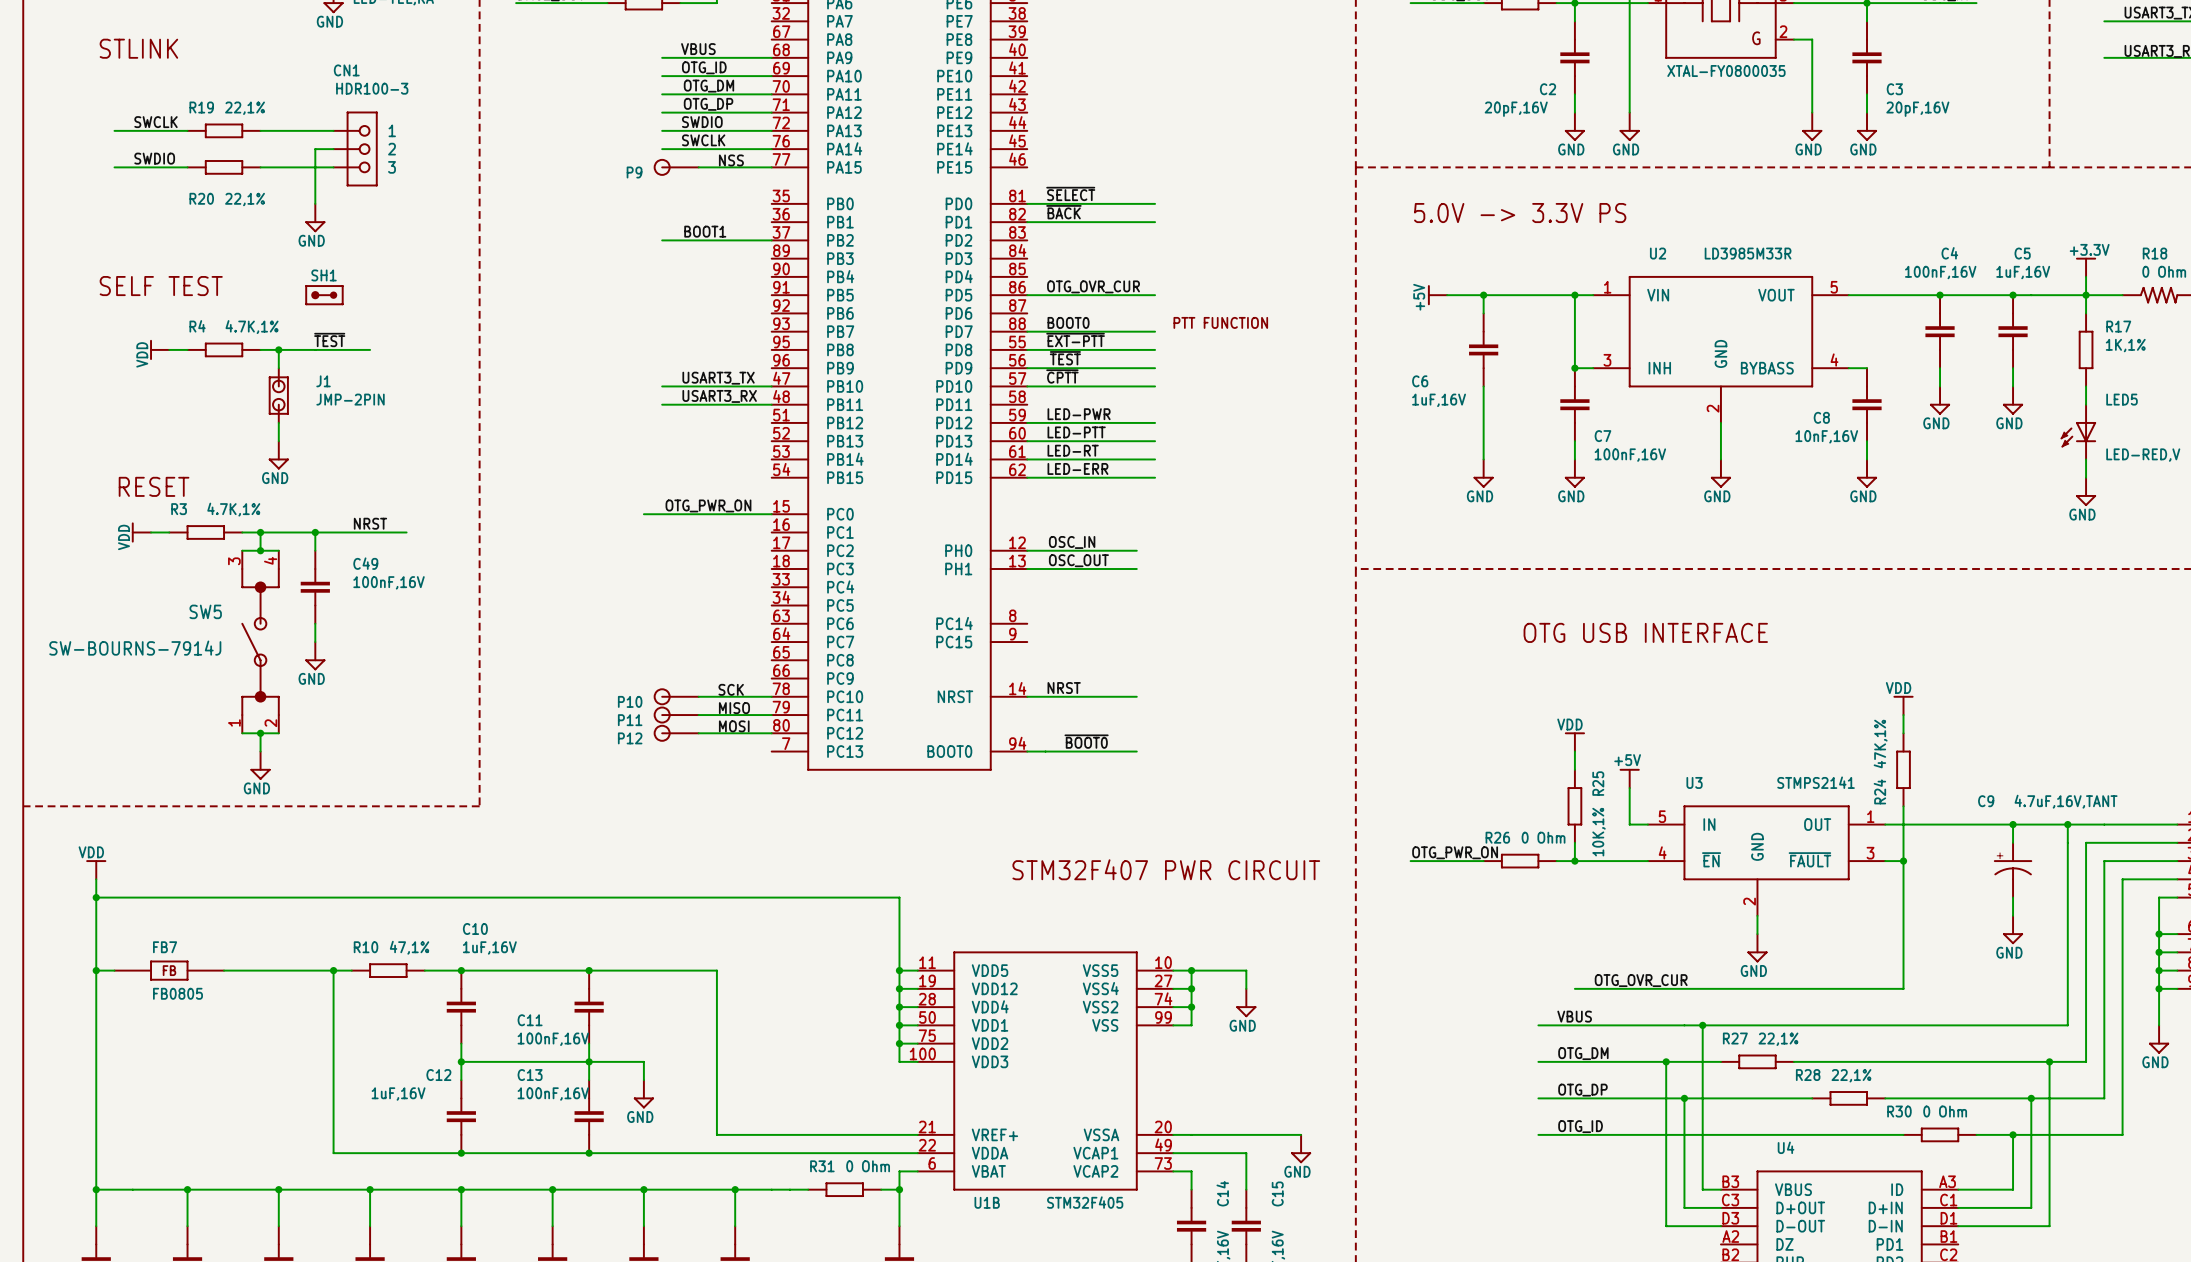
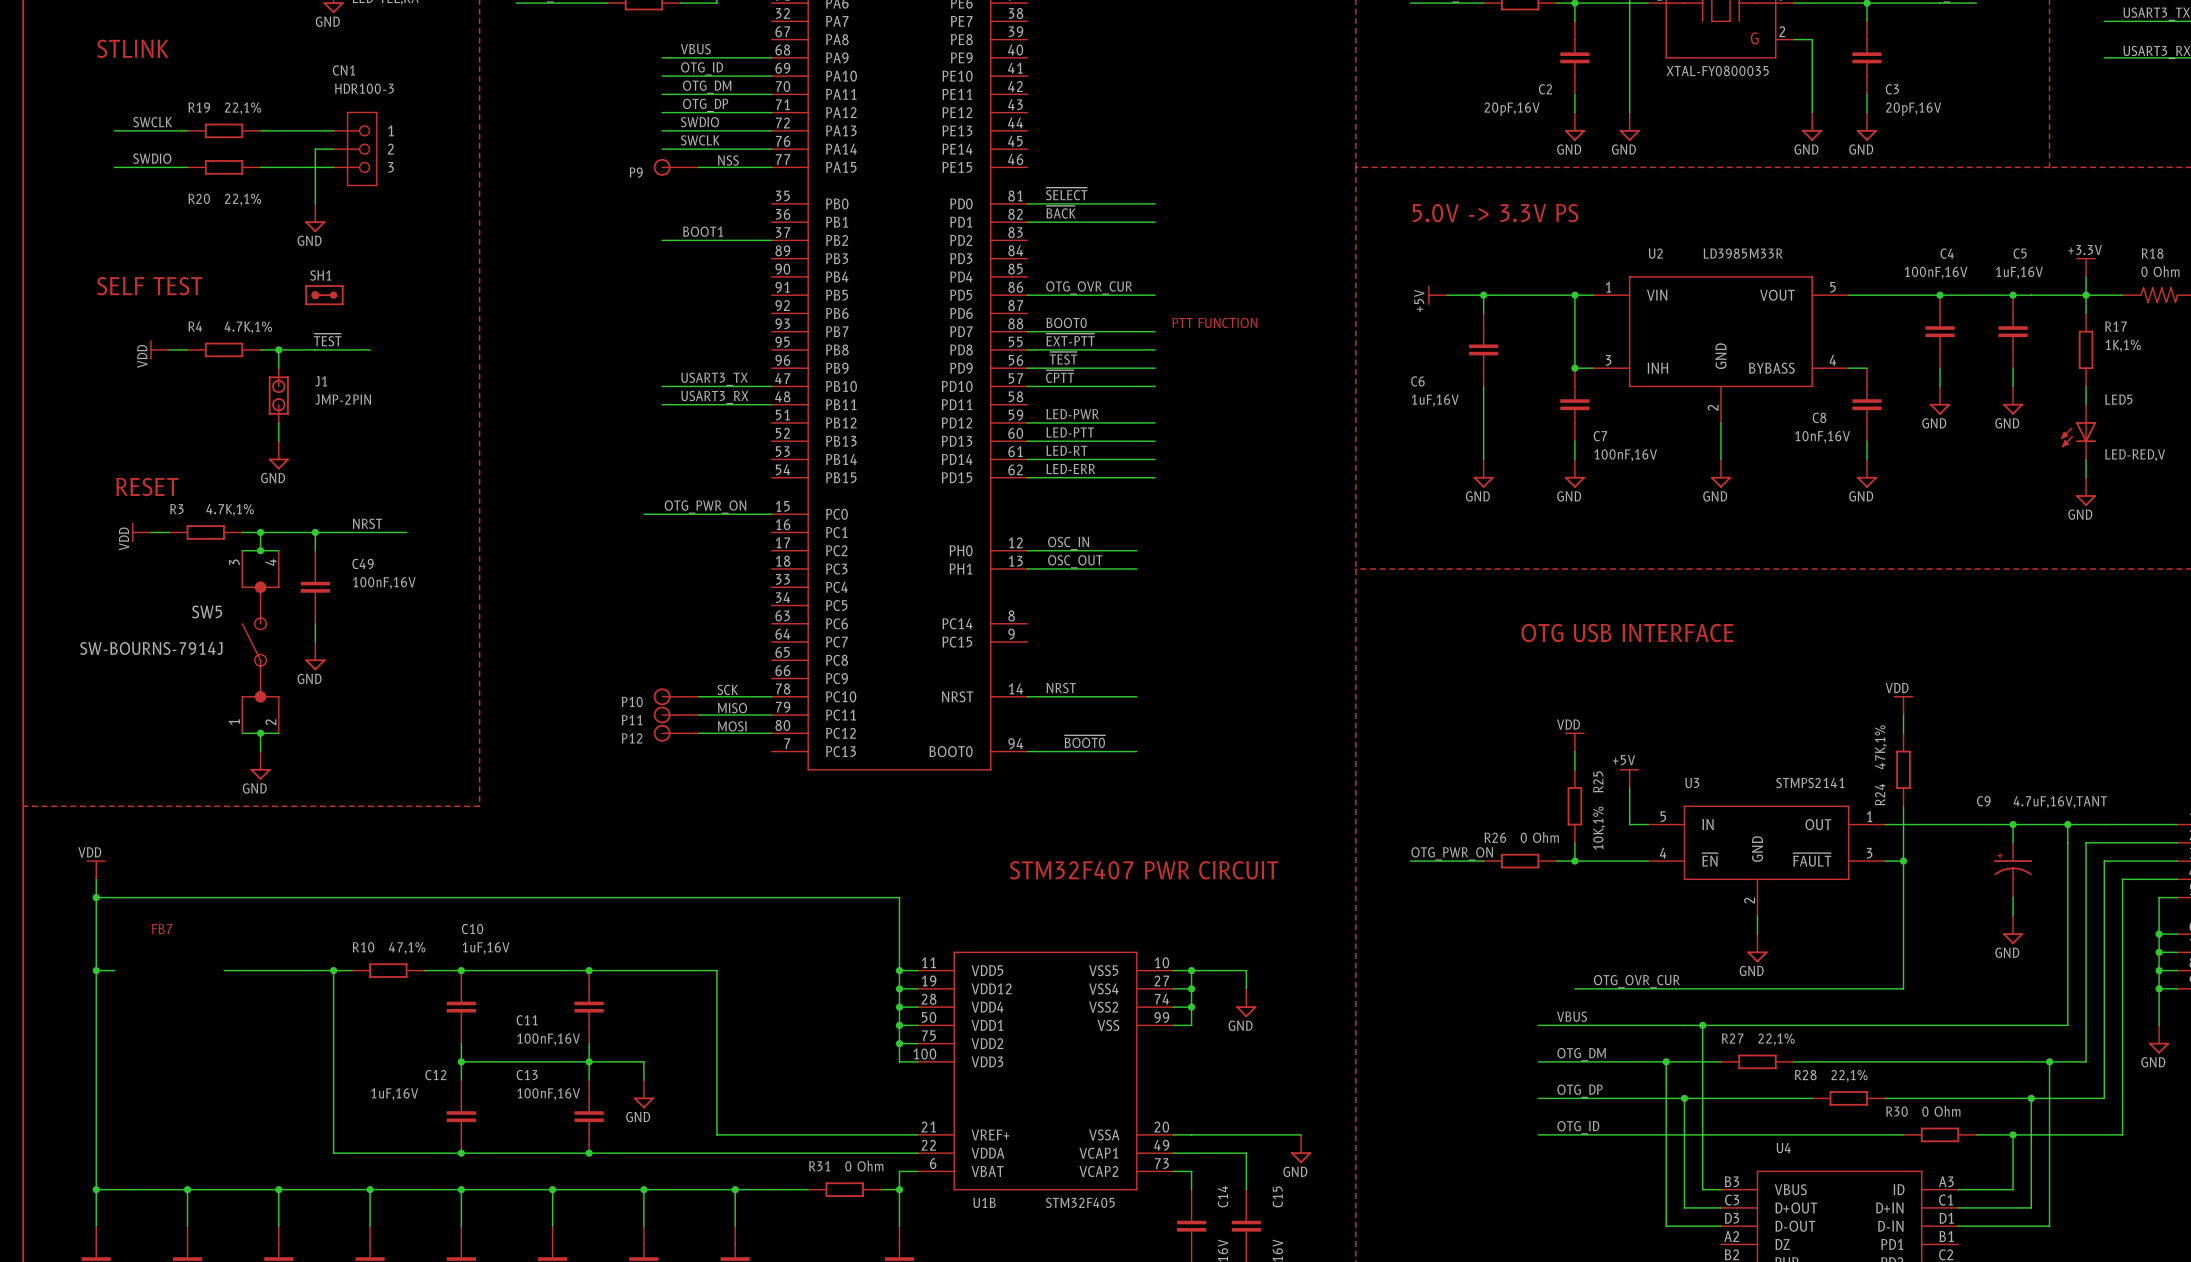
text: none -> FB7 (162, 929)
FB7: FB0805 (169, 970) -> none

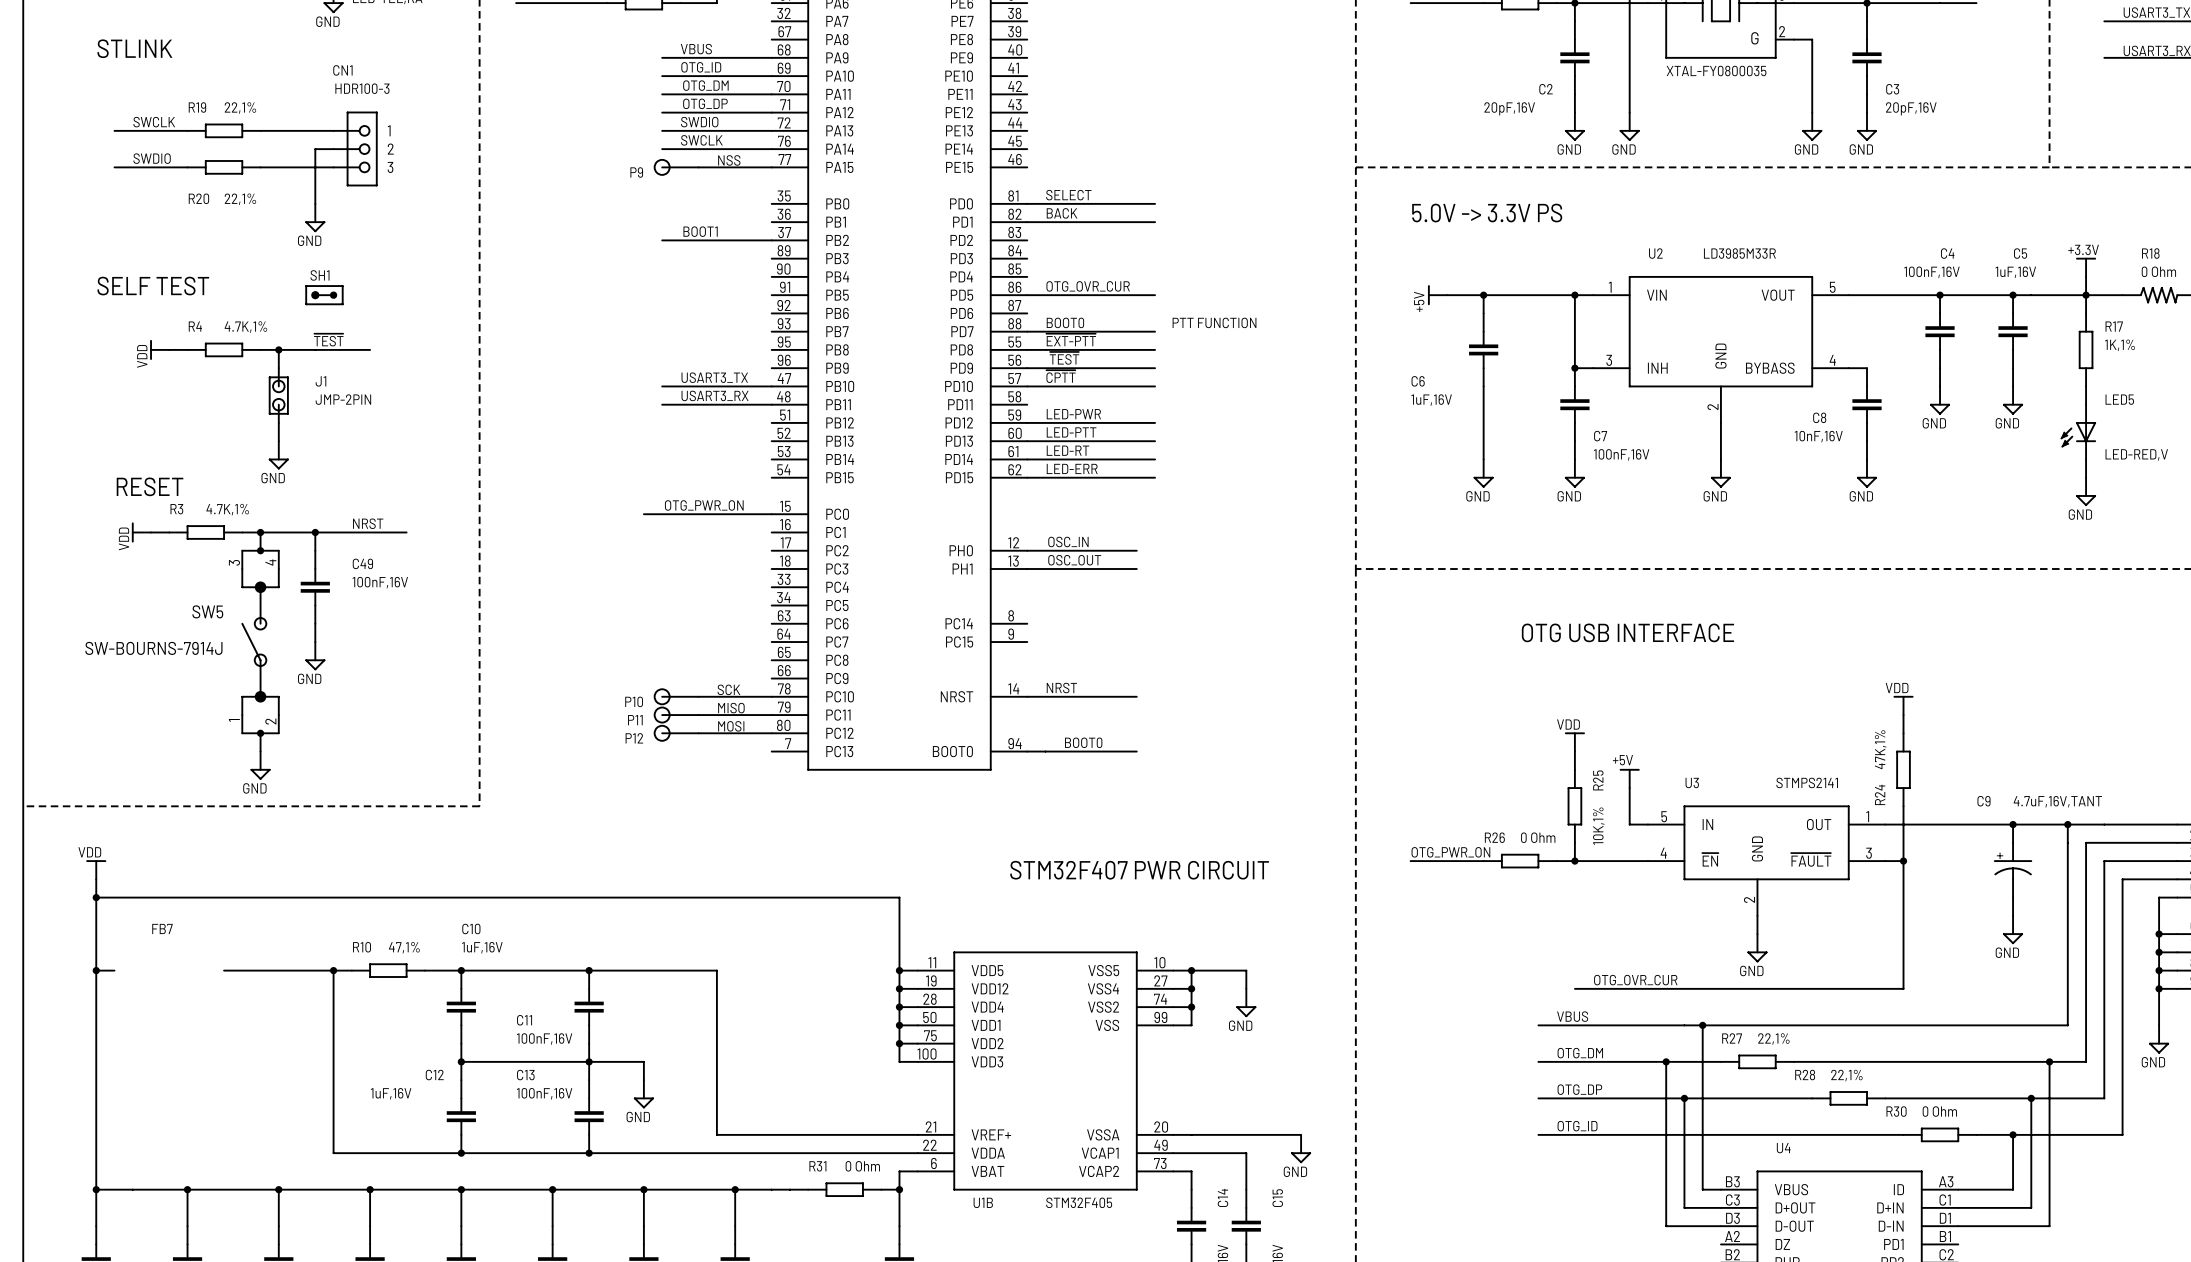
label: ~{SELECT} (1066, 194) -> SELECT (1068, 195)
label: ~{BACK} (1061, 212) -> BACK (1062, 213)
label: ~{BOOT0} (1084, 741) -> BOOT0 (1083, 742)

